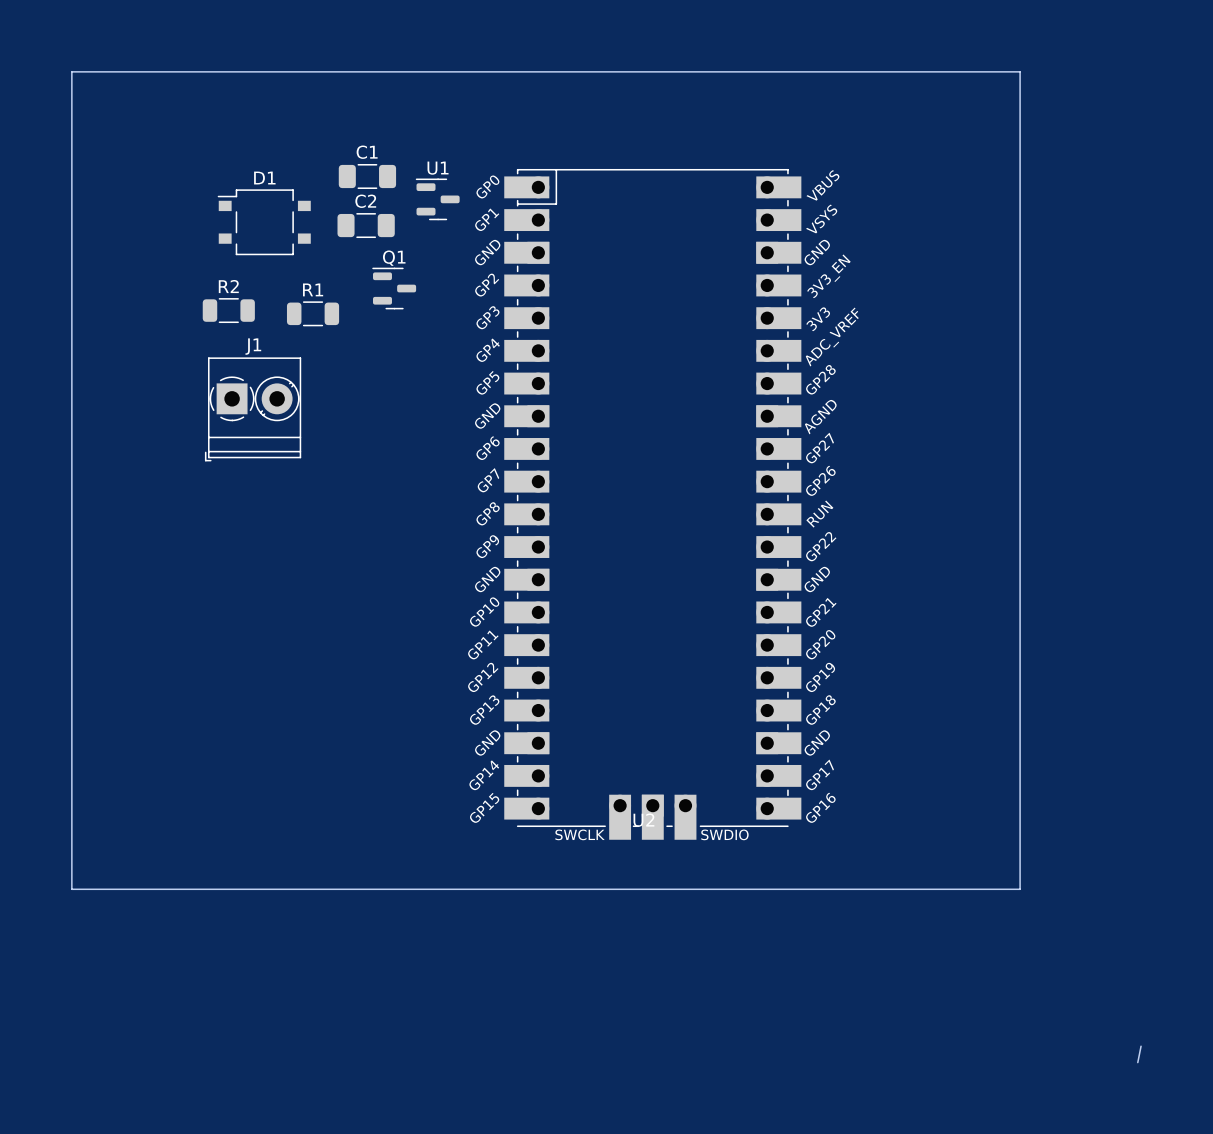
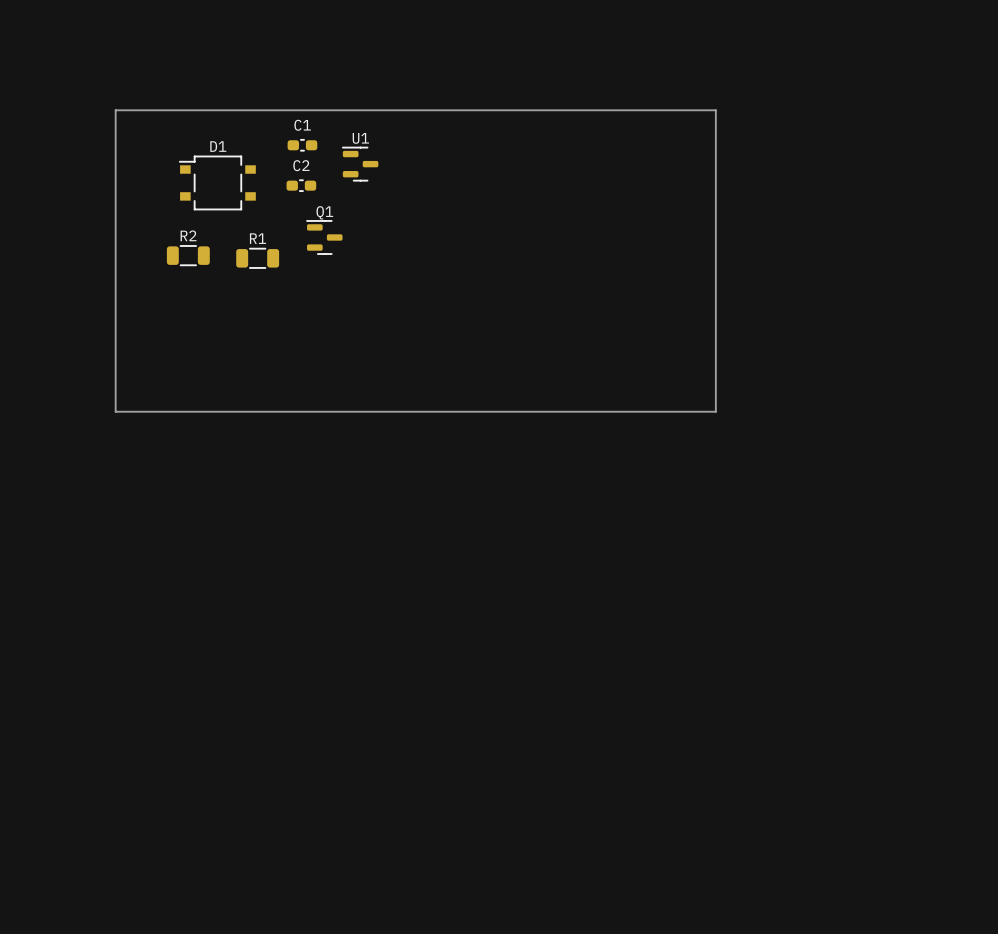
board edge: (71, 71) (1020, 71) (1020, 889) (71, 889) (71, 71) -> none
board edge: none -> (115, 110) (115, 411) (715, 411) (715, 110) (115, 110)
C1 footprint: [338, 164, 397, 189] -> [287, 139, 318, 152]
C2 footprint: [337, 213, 395, 239] -> [286, 179, 317, 192]
J1: (253, 409) -> none
part: (652, 504) -> none
board edge: (1141, 1046) (1137, 1062) -> none

